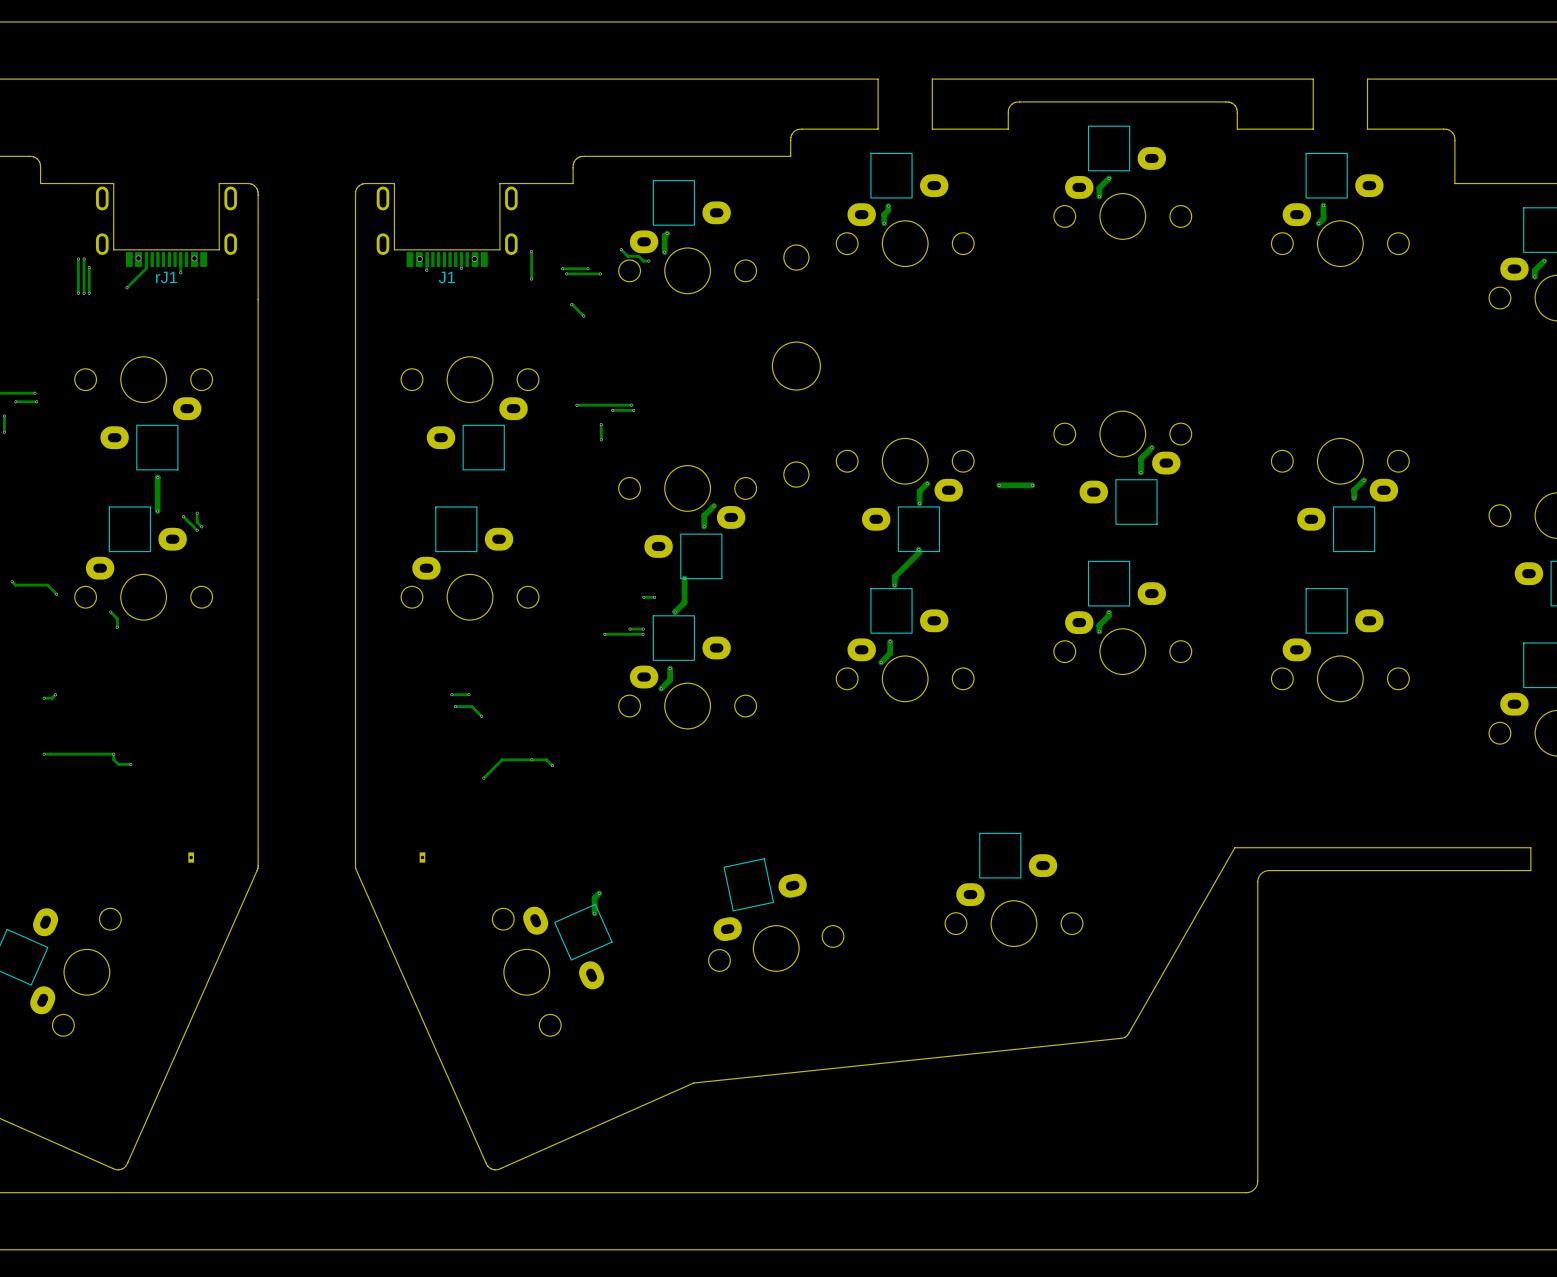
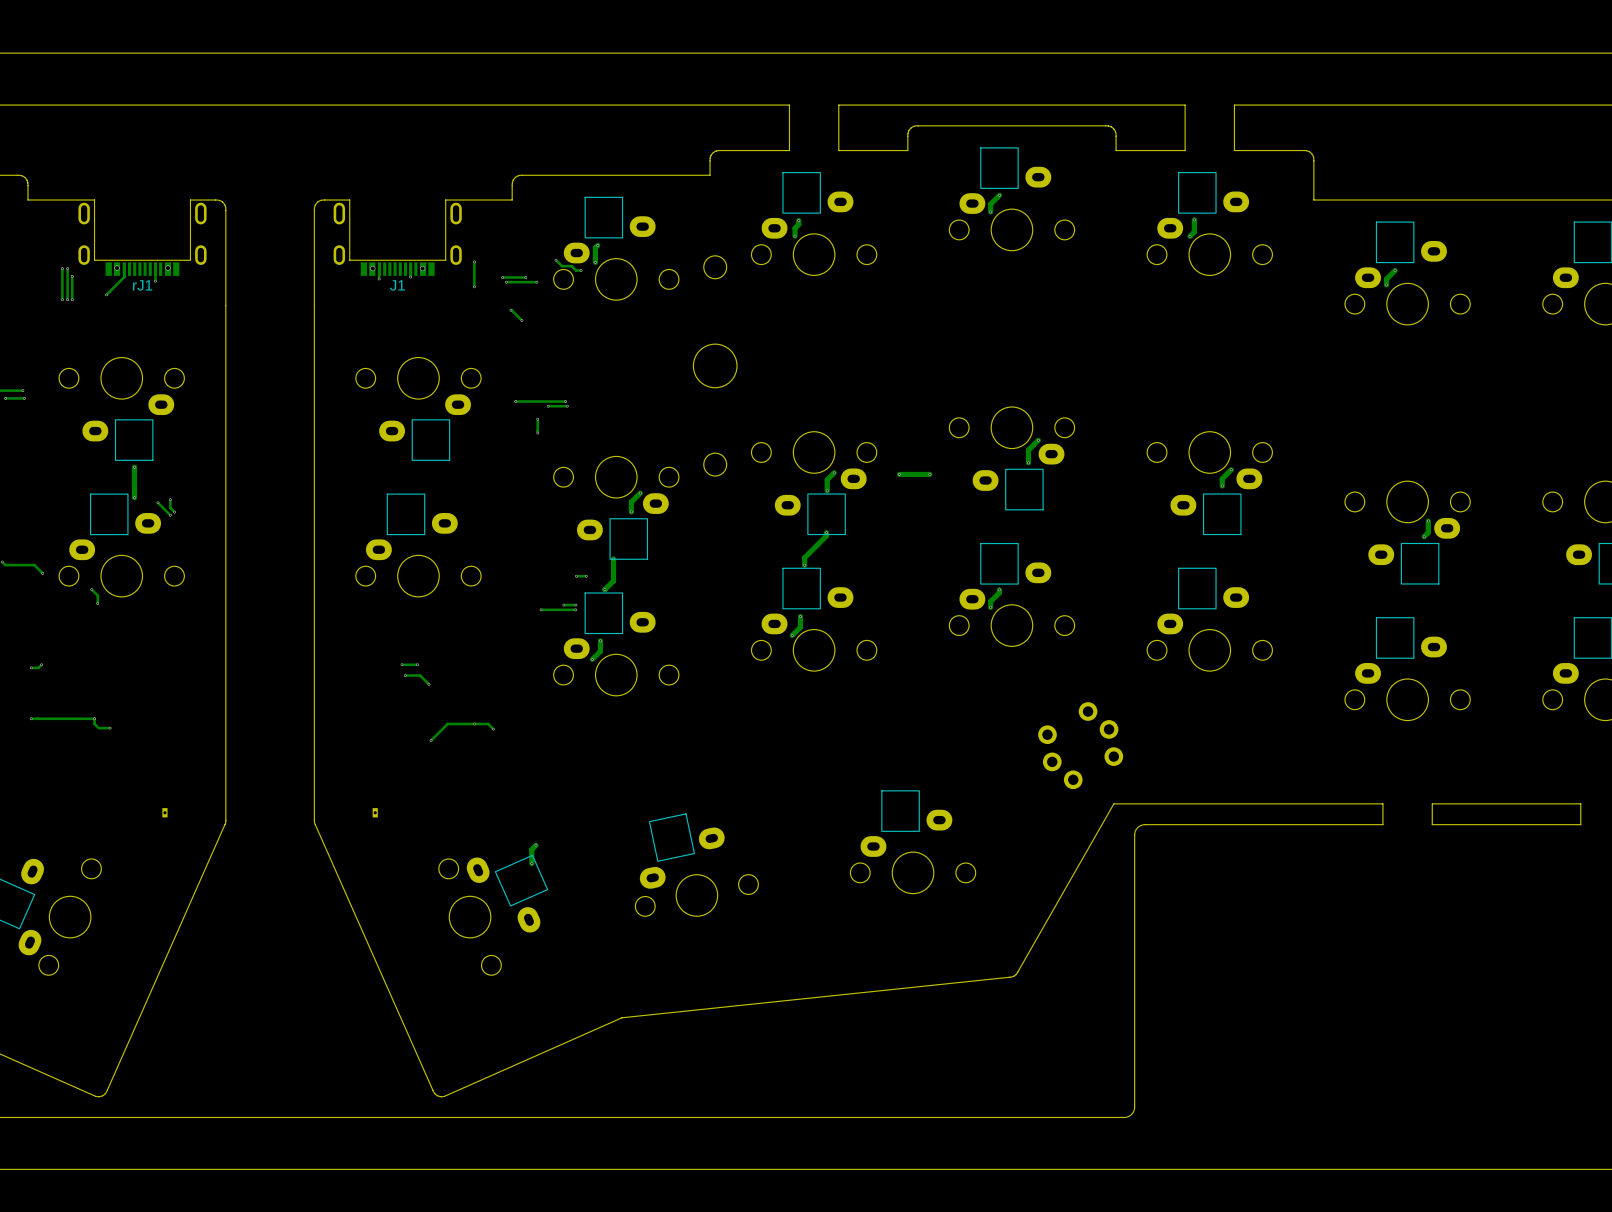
part: none -> (1080, 745)

